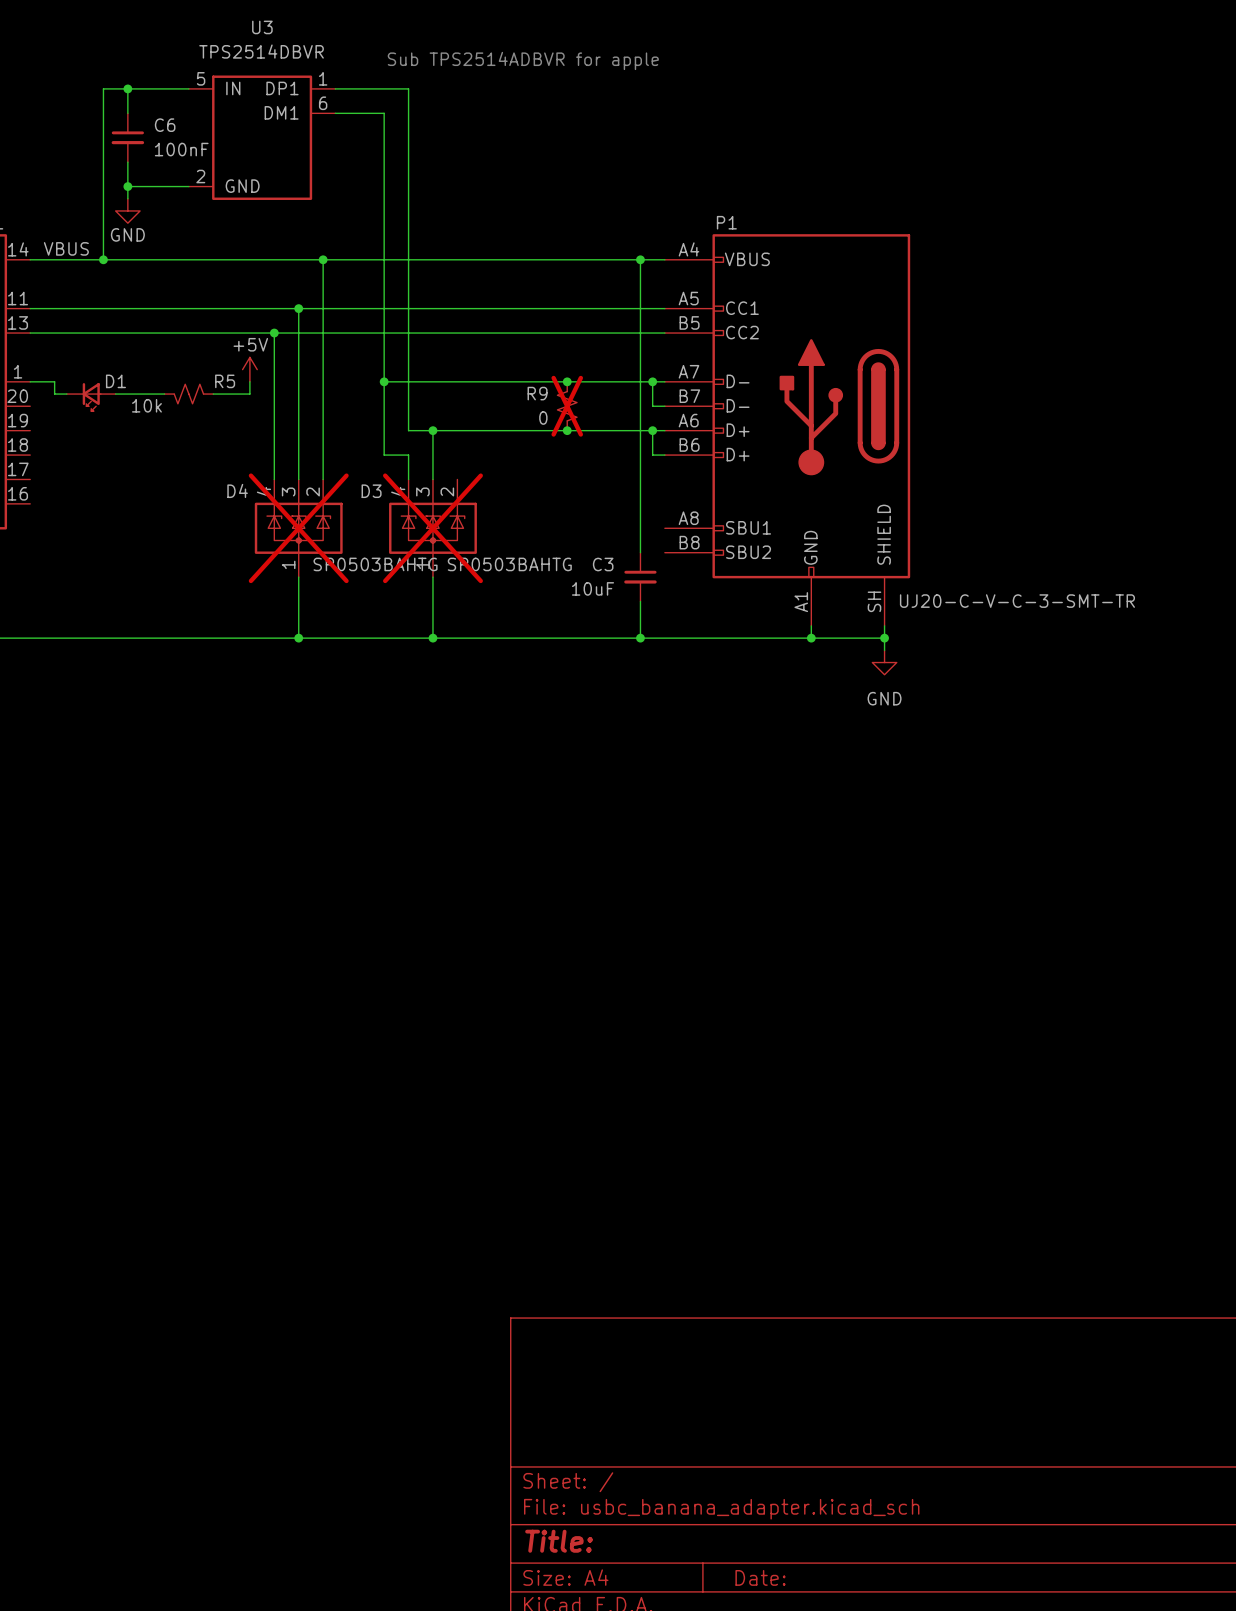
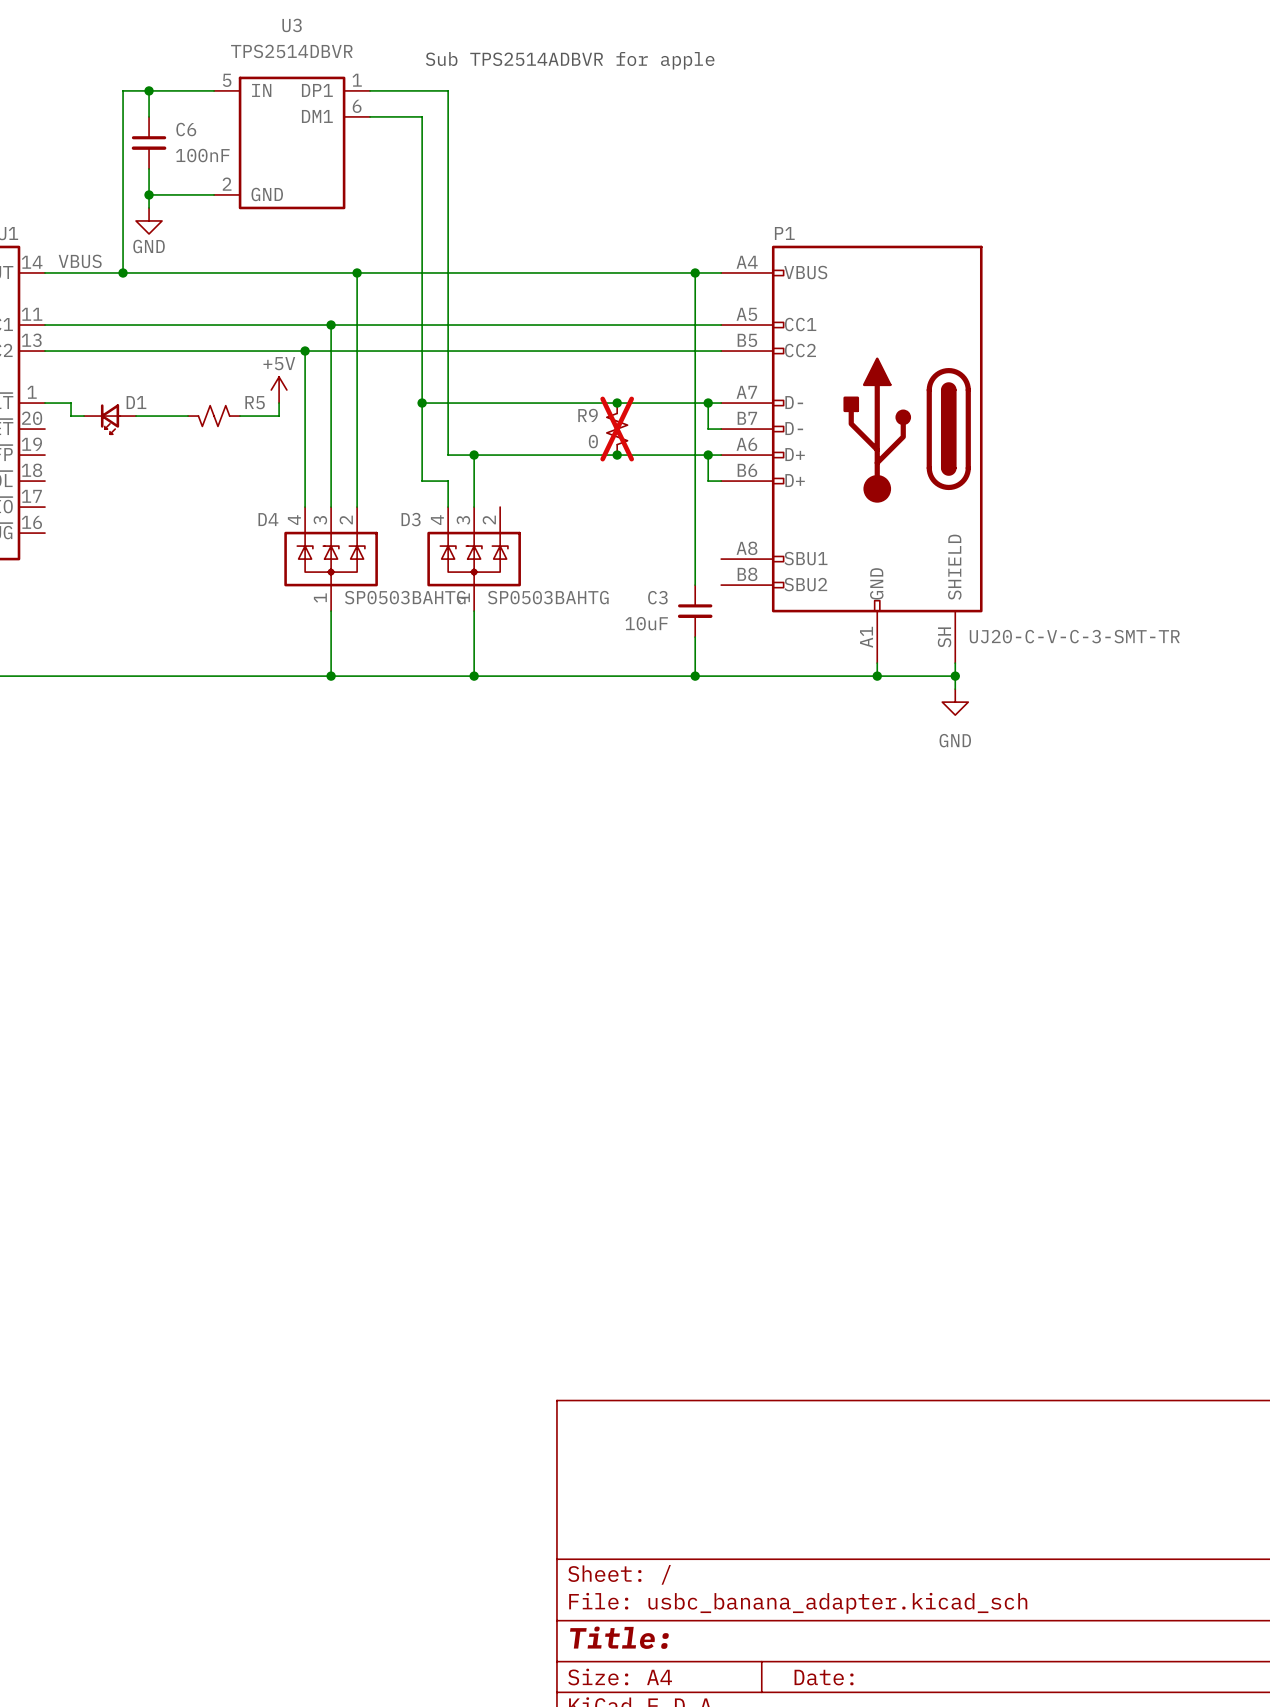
R5 value: 10k (146, 405) -> none
D4 do-not-place cross: (298, 528) -> none
D3 do-not-place cross: (432, 528) -> none

